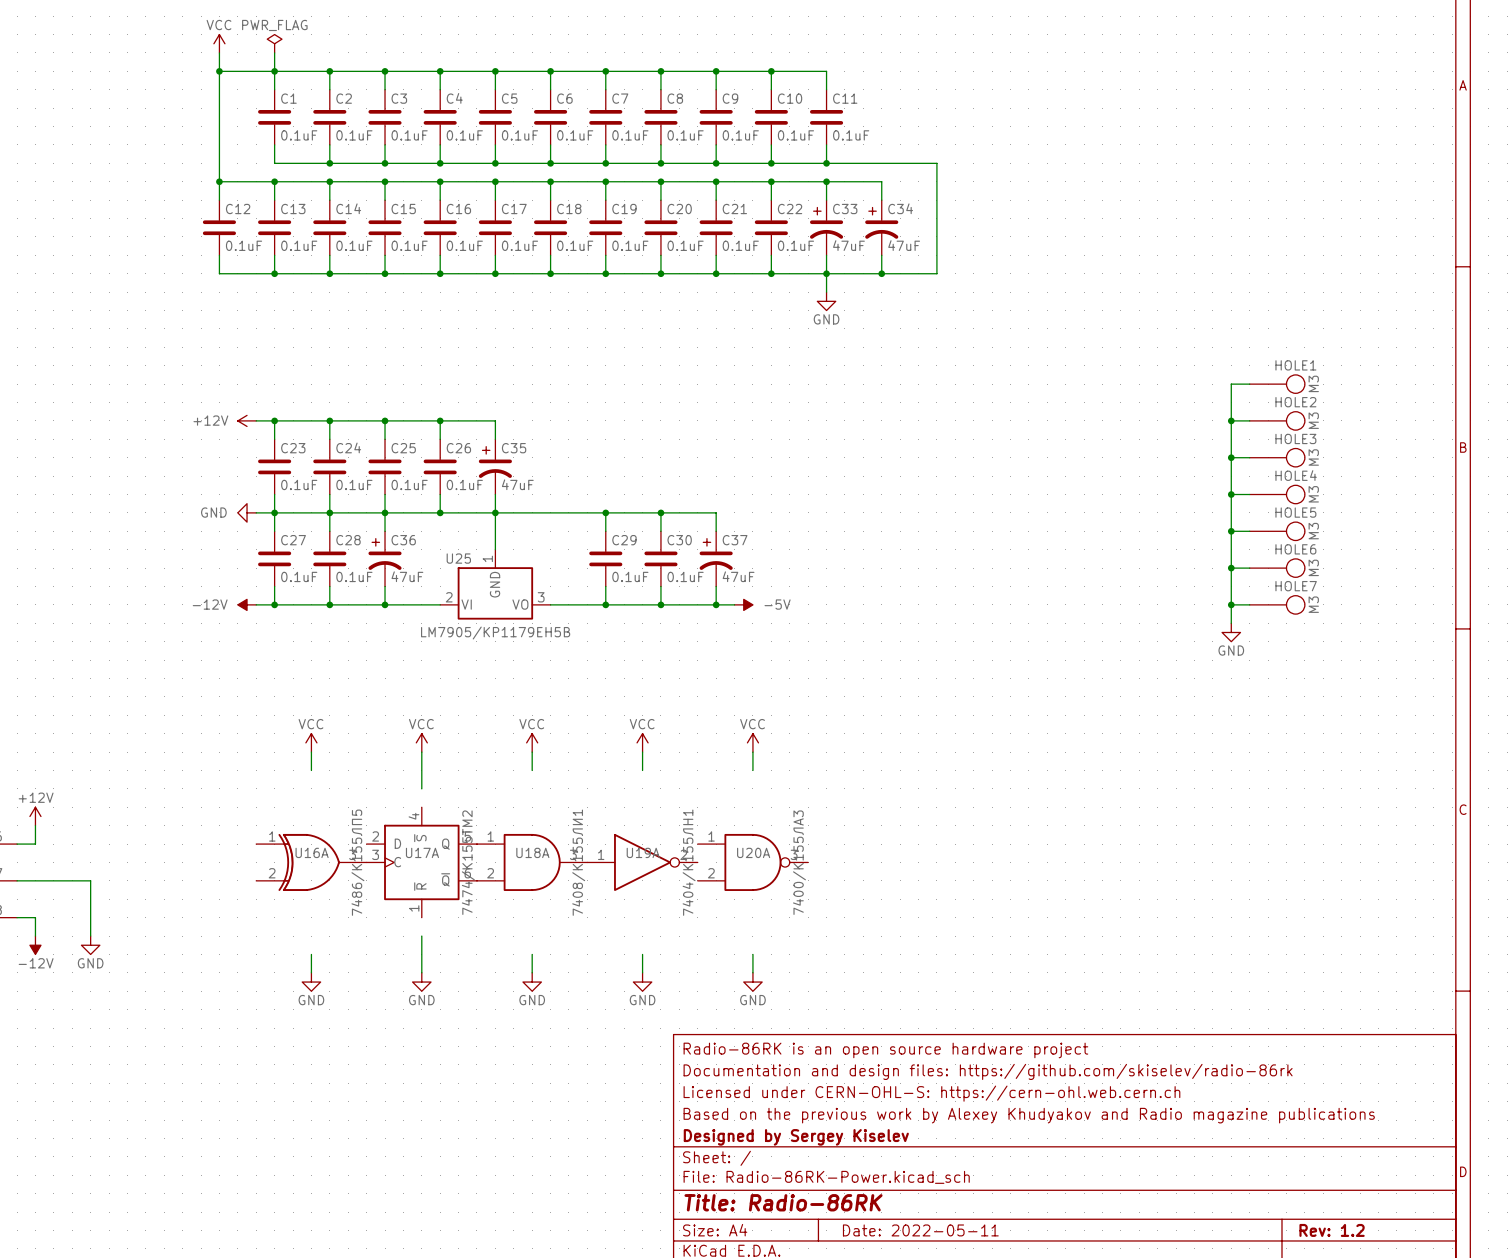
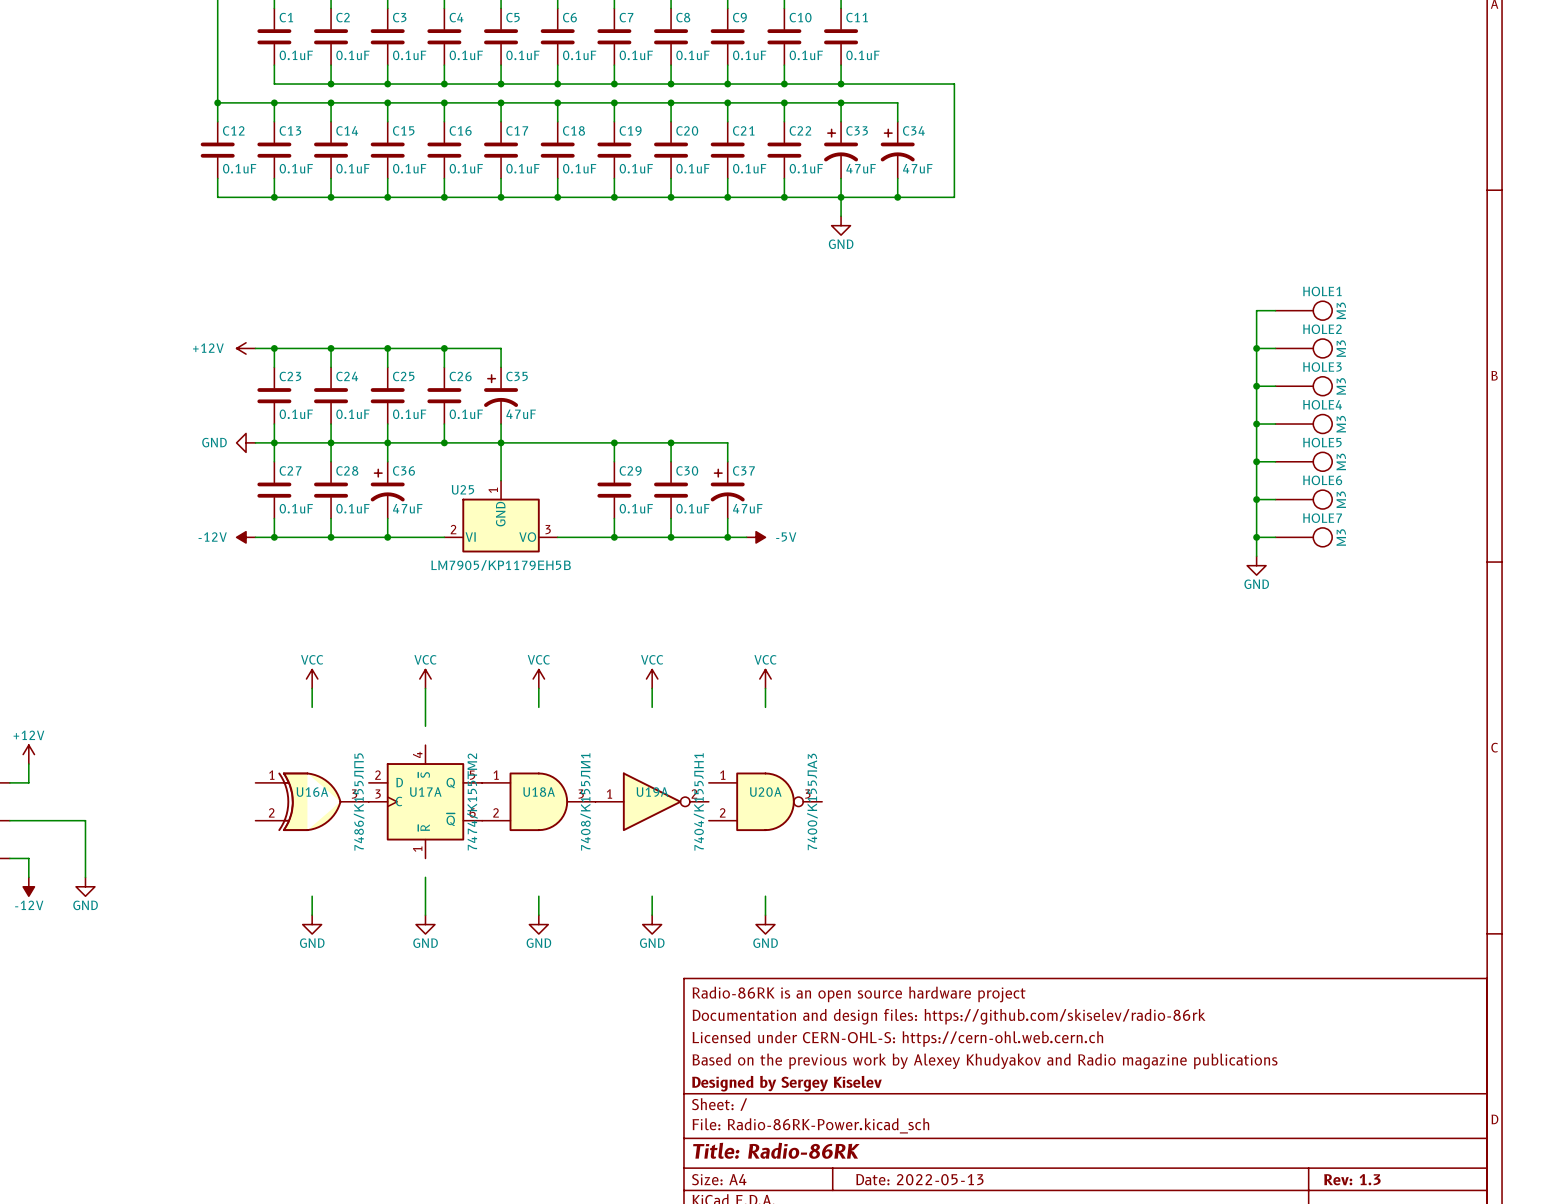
title block: Date: 2022-05-11 (920, 1230) -> Date: 2022-05-13 (919, 1179)
title block: Rev: 1.2 (1332, 1230) -> Rev: 1.3 (1352, 1179)

